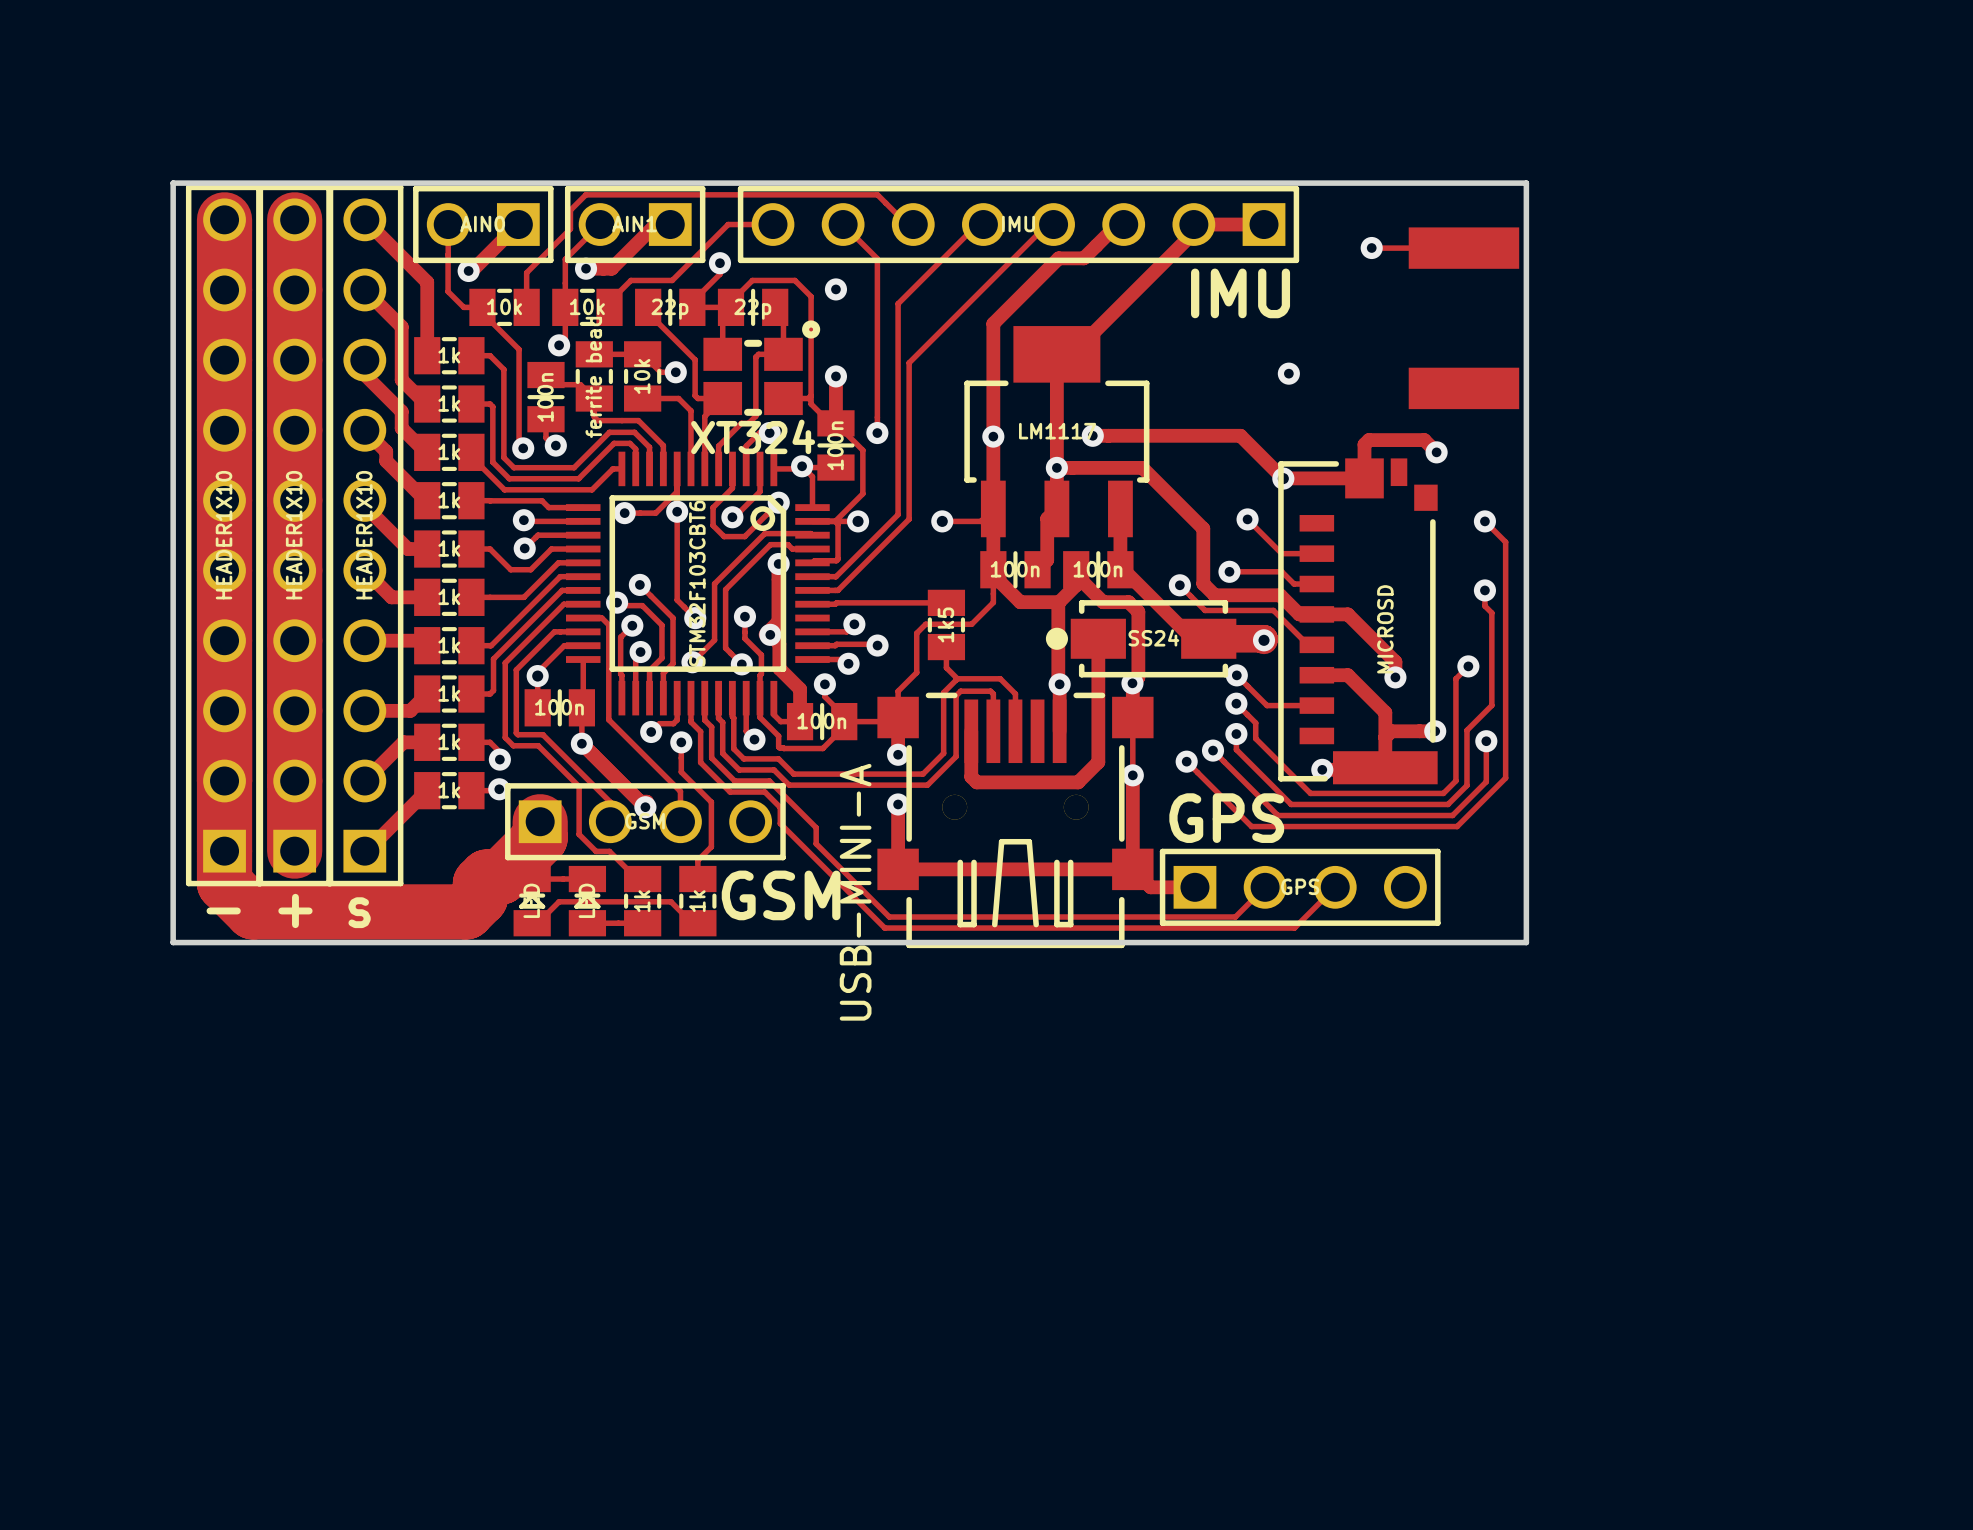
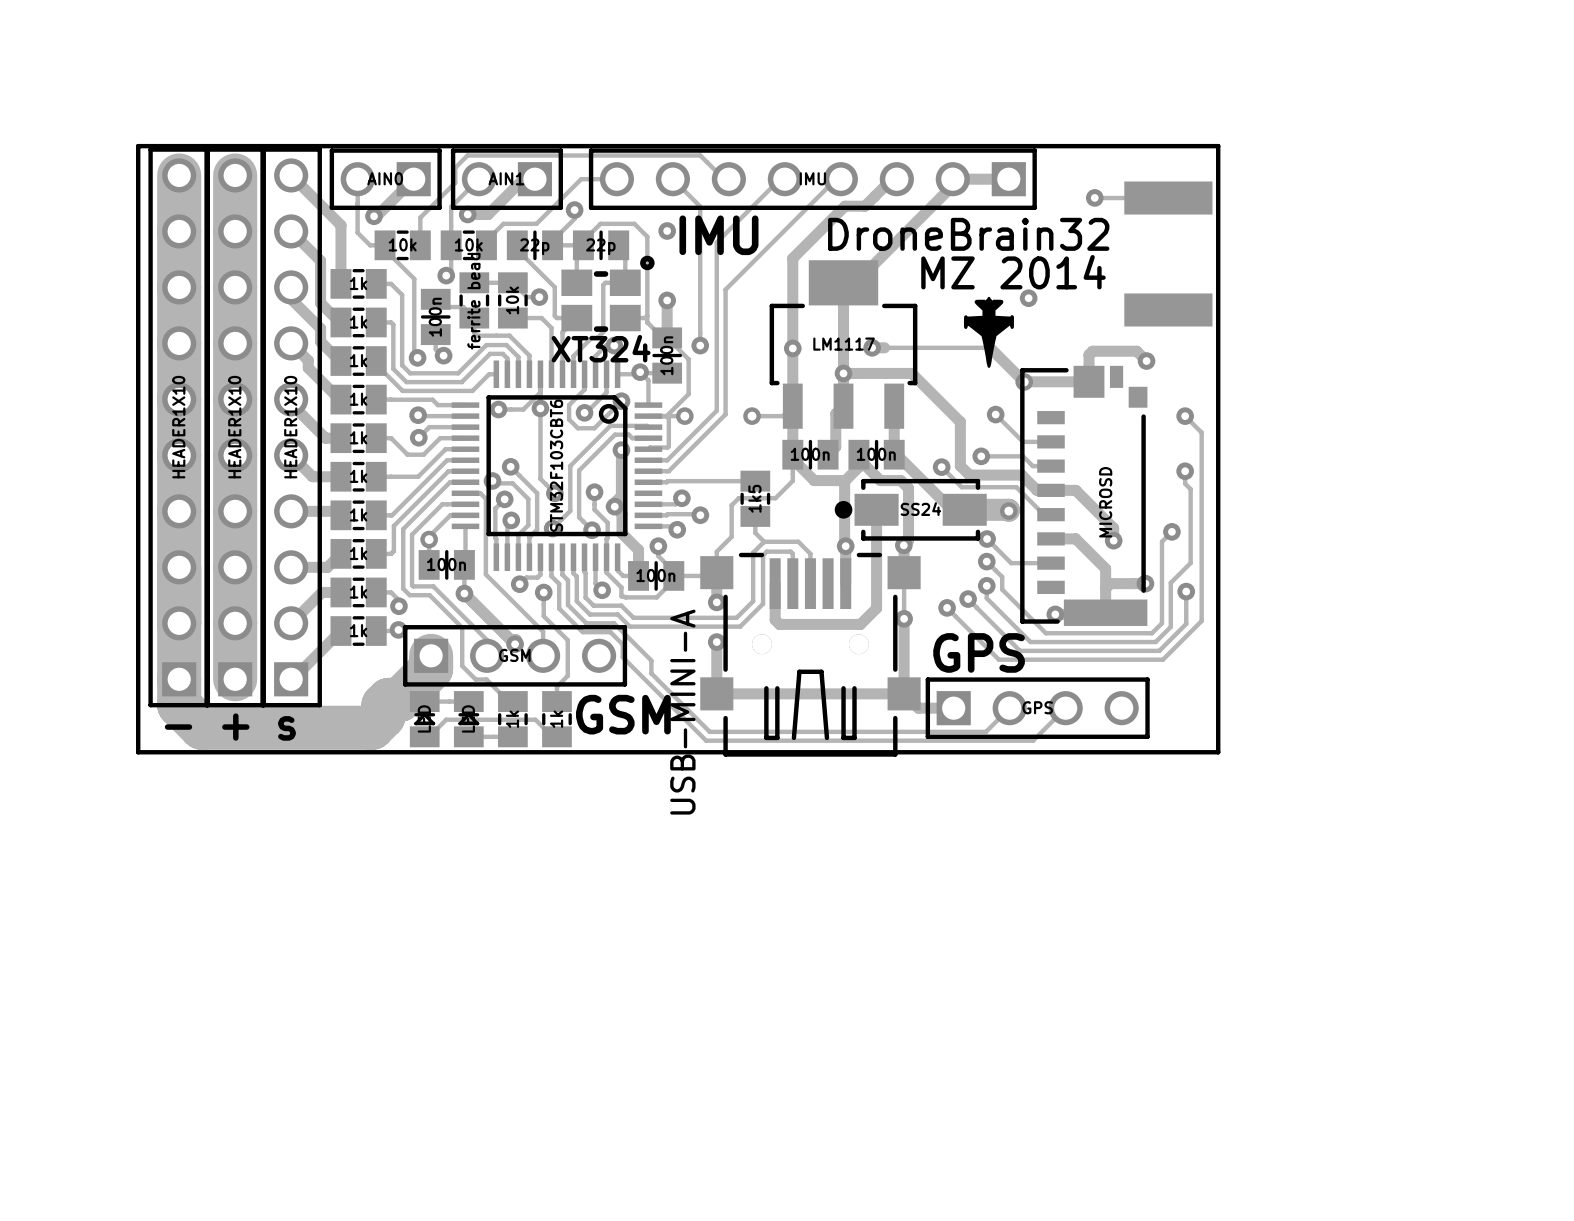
text: IMU (1240, 293) -> DroneBrain32 (968, 234)
text: none -> IMU (718, 235)
text: none -> MZ 2014 (1013, 272)
drawing: none -> [963, 296, 1014, 368]
track width: thick (1108, 435) (1240, 435) -> thin (884, 347) (990, 347)

